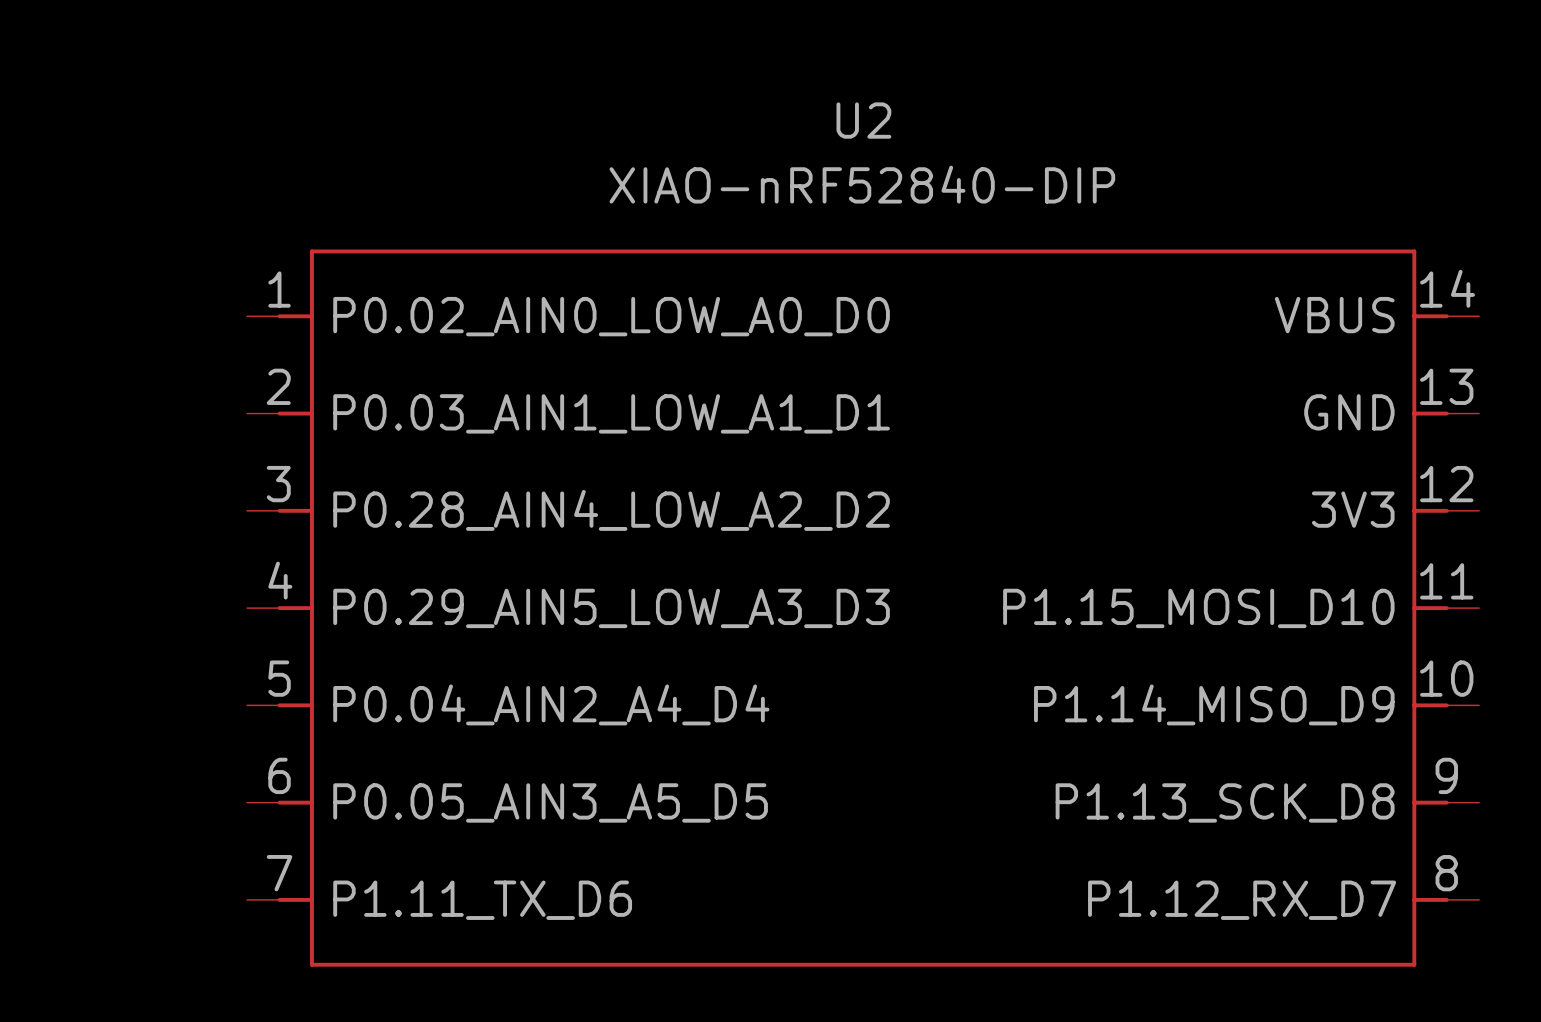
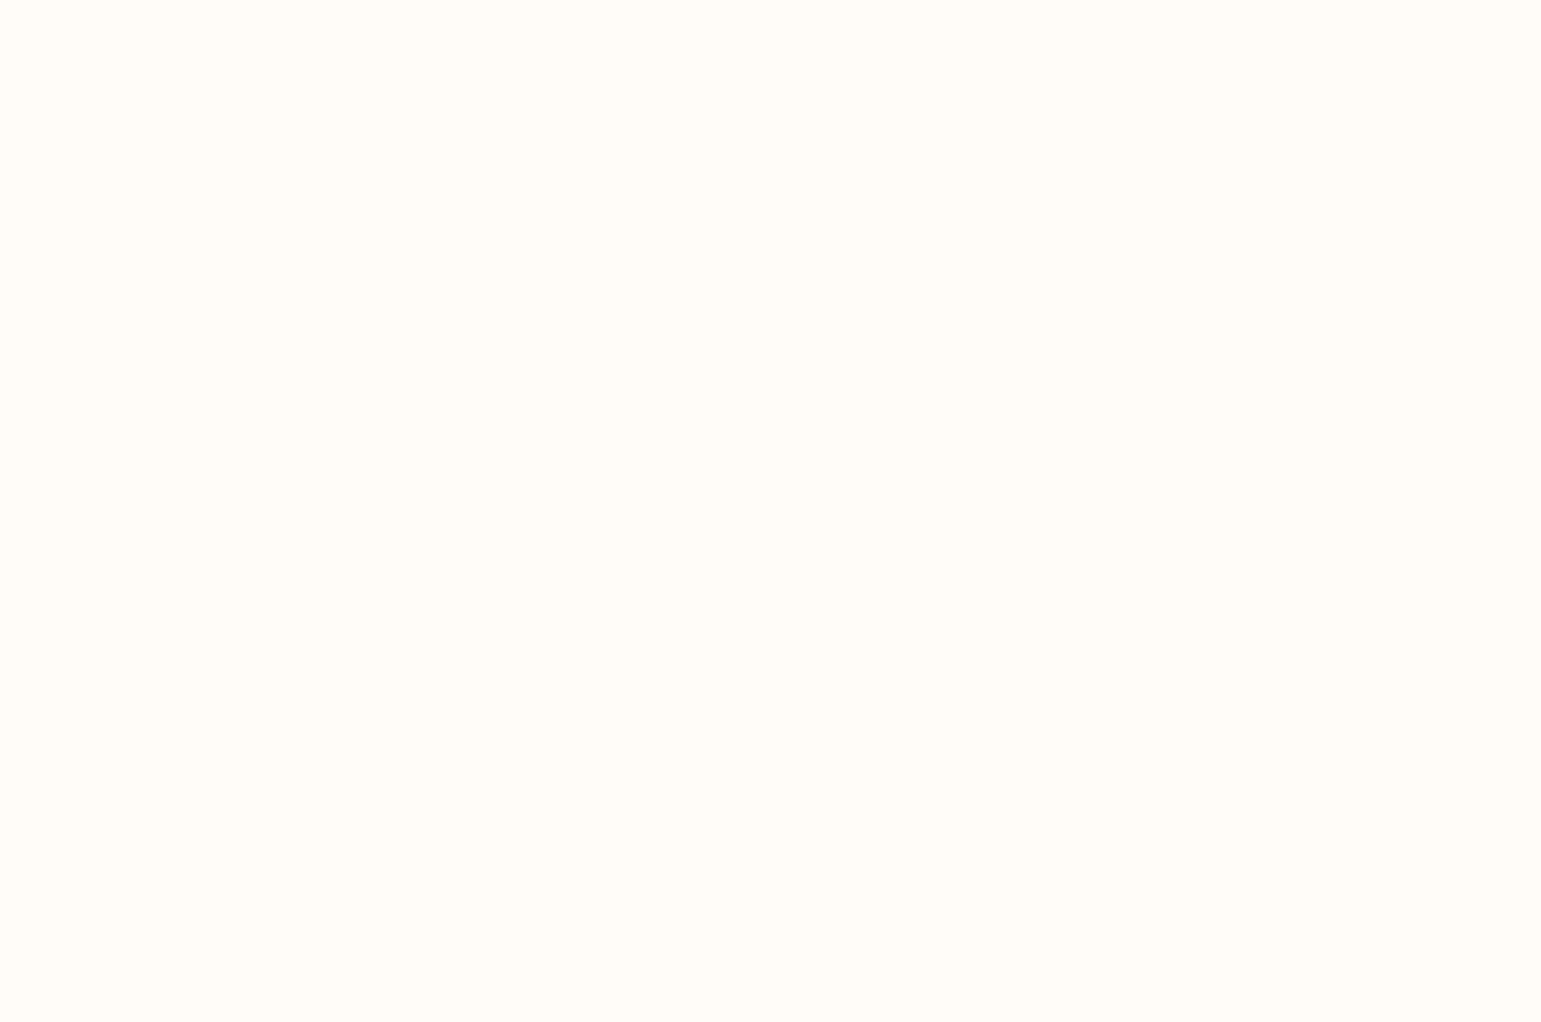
U2: XIAO-nRF52840-DIP (863, 608) -> none

